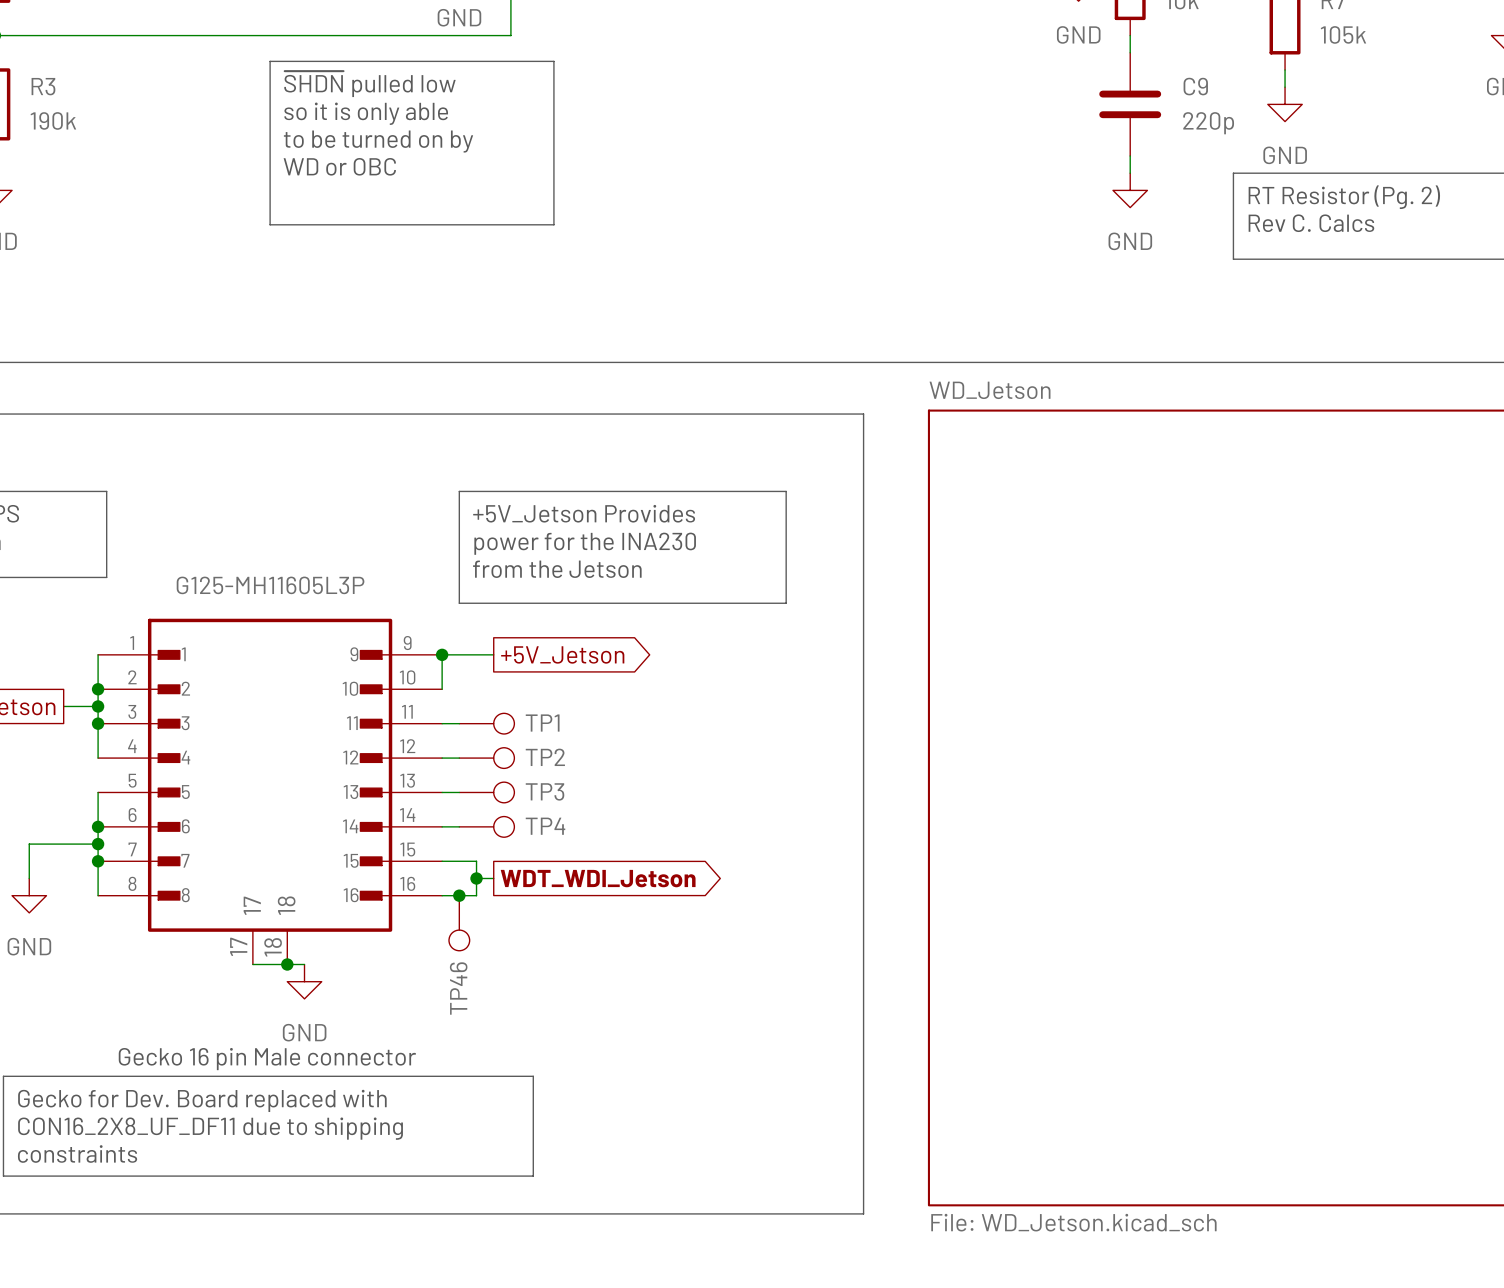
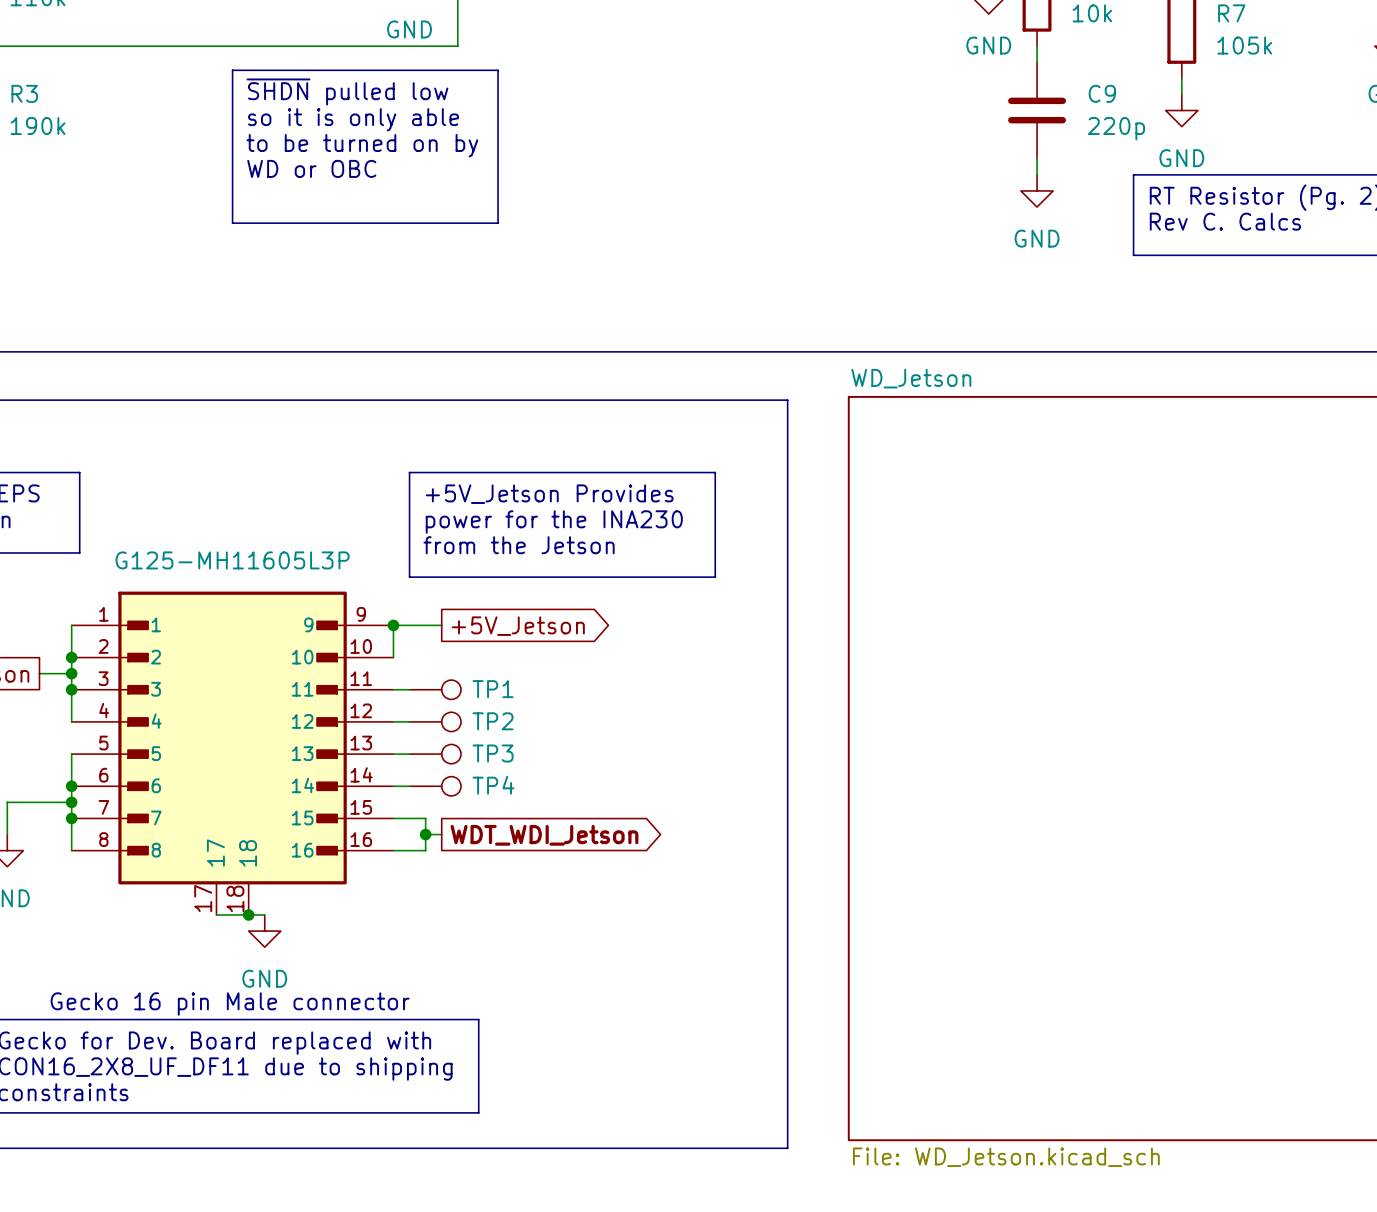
junction: (459, 895) -> none
TP46: (459, 923) -> none

